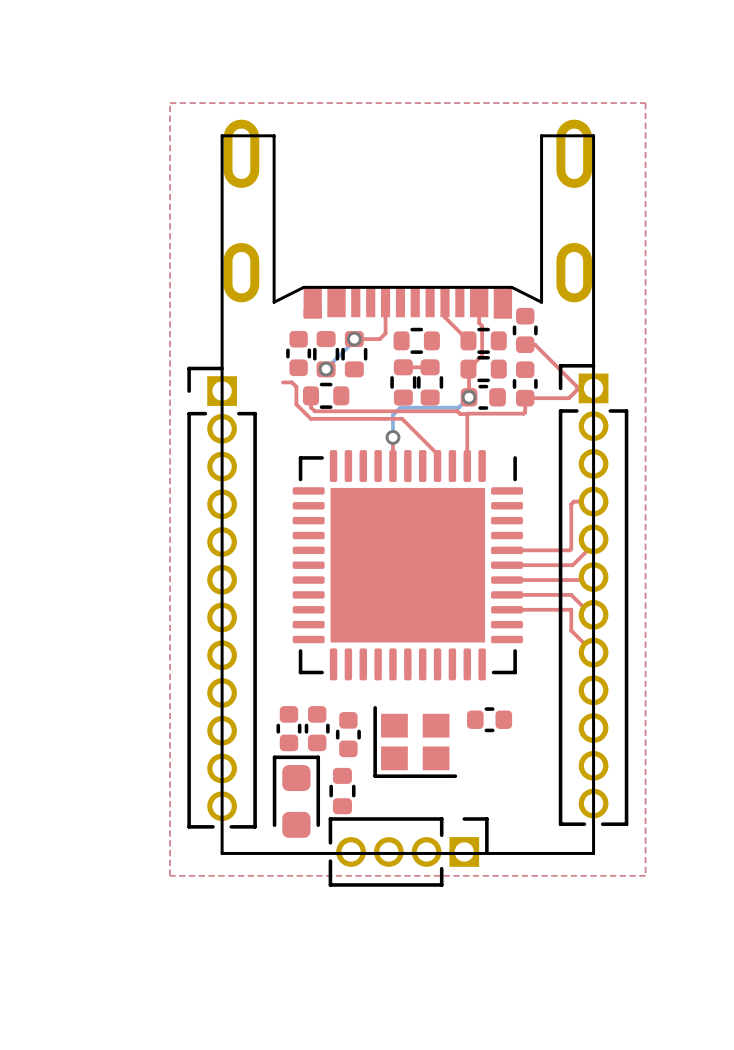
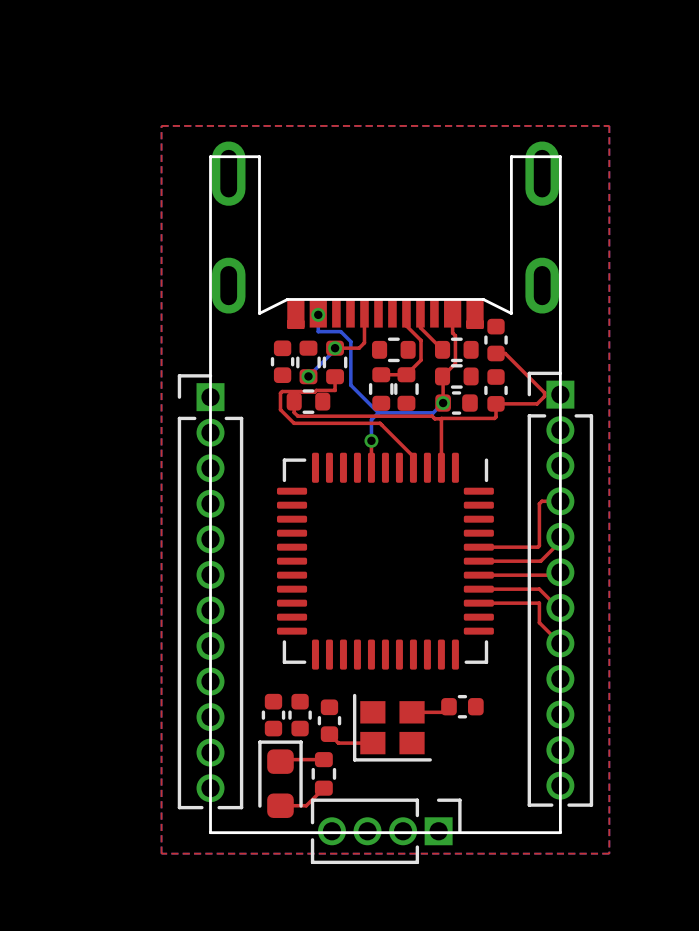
top track: none -> (406, 313) (406, 325) (421, 340) (421, 360) (406, 374)
bottom track: none -> (318, 314) (318, 331) (340, 331) (350, 341) (350, 385) (378, 412)
via: none -> (318, 314)
top track: (283, 382) (291, 382) (296, 386) -> (335, 376) (335, 390) (282, 391) (280, 393)
part footprint: [292, 450, 523, 681] -> [276, 452, 494, 670]
top track: none -> (448, 706) (443, 712) (412, 712)
top track: none -> (329, 734) (338, 743) (372, 743)
top track: none -> (323, 759) (282, 759) (280, 761)
top track: none -> (323, 788) (306, 805) (280, 805)

